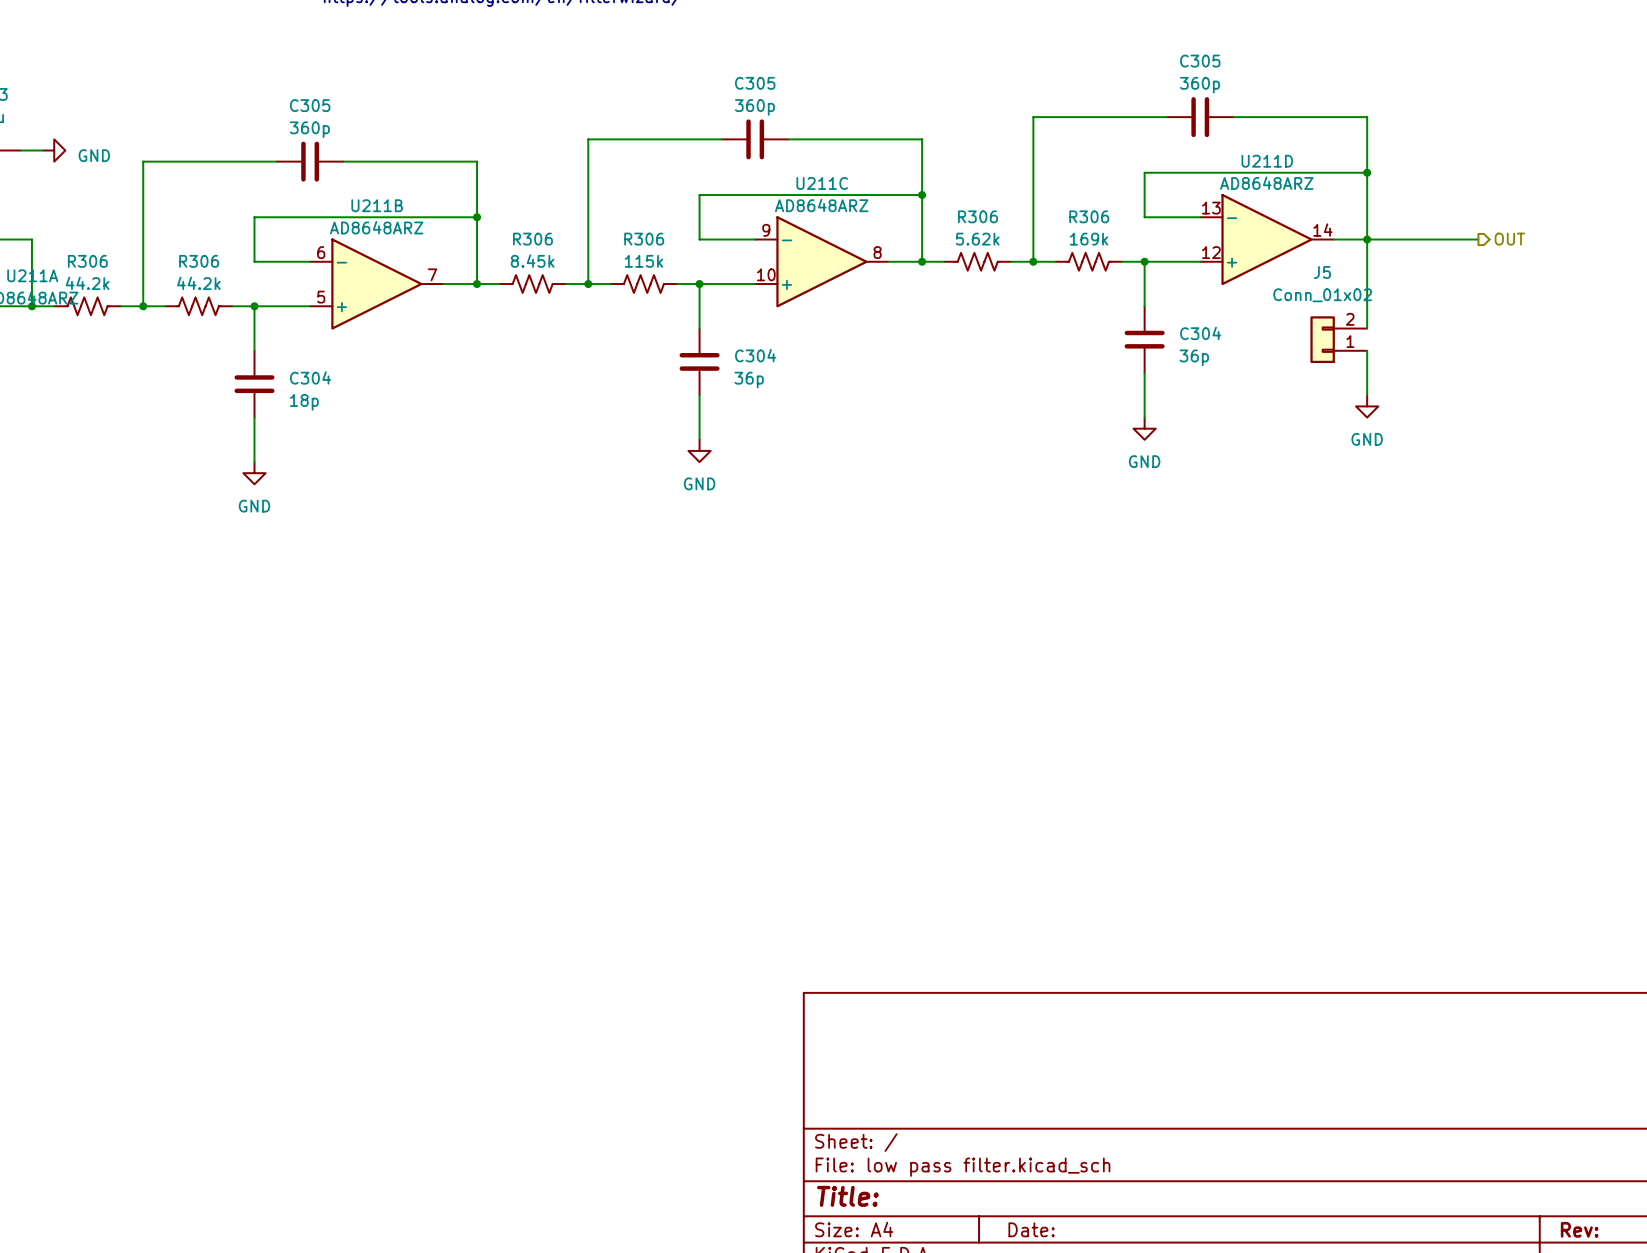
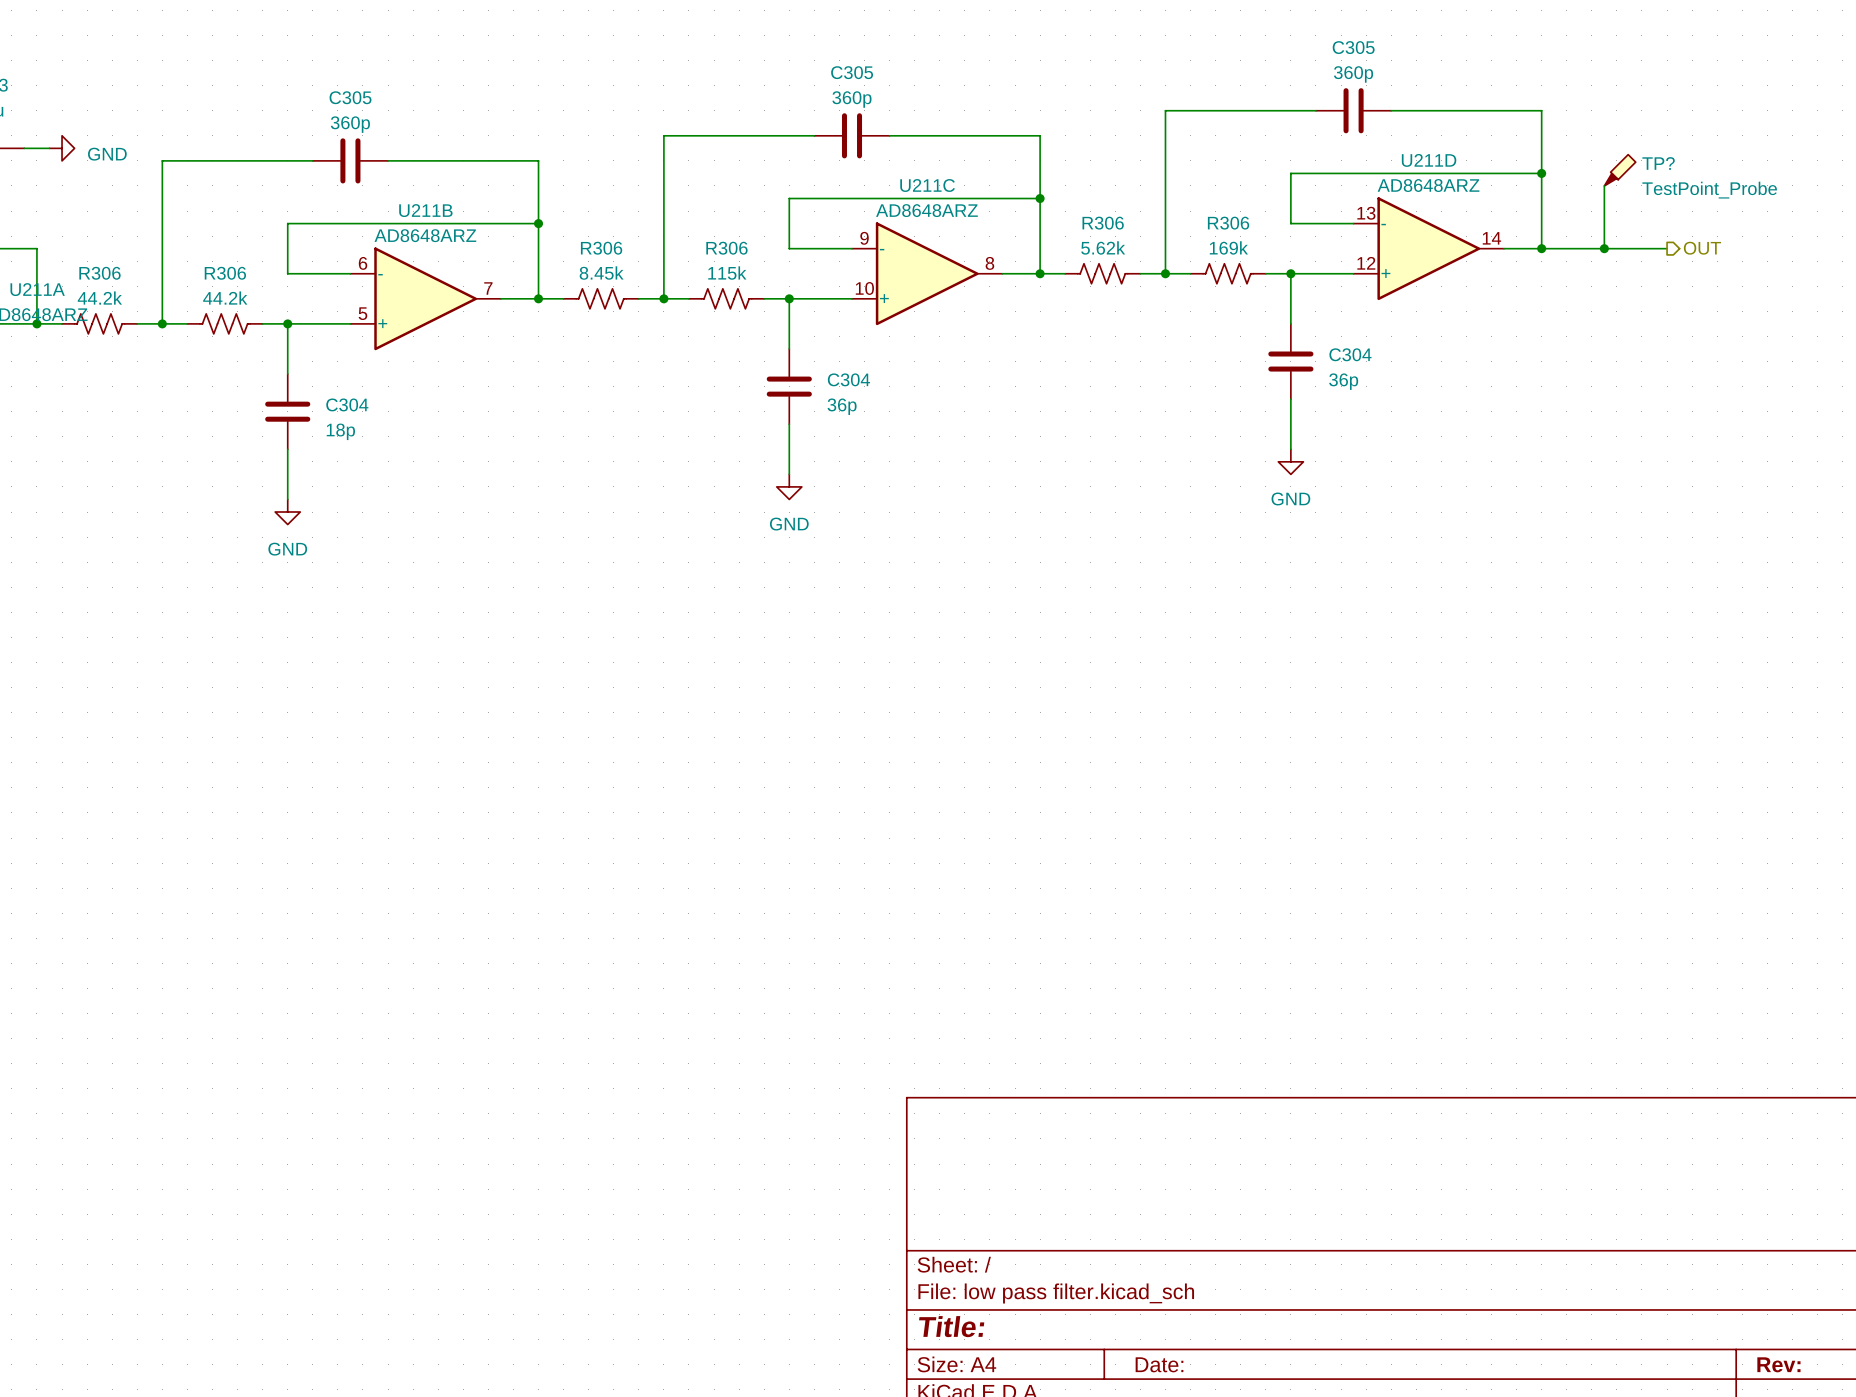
TP?: none -> TestPoint_Probe (1620, 170)
wire: none -> (1604, 185) (1604, 248)
wire: (1367, 239) (1367, 328) -> none
junction: none -> (1604, 248)
J5: Conn_01x02 (1338, 339) -> none
wire: (1367, 350) (1367, 395) -> none
power symbol: GND (1367, 406) -> none

